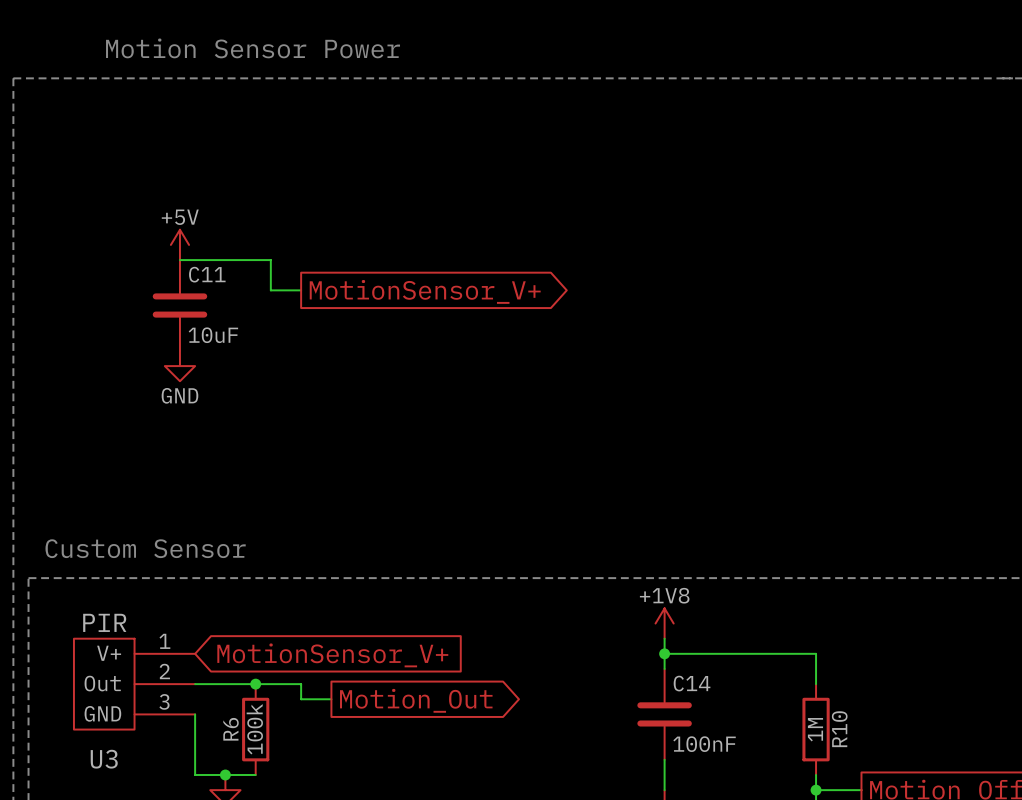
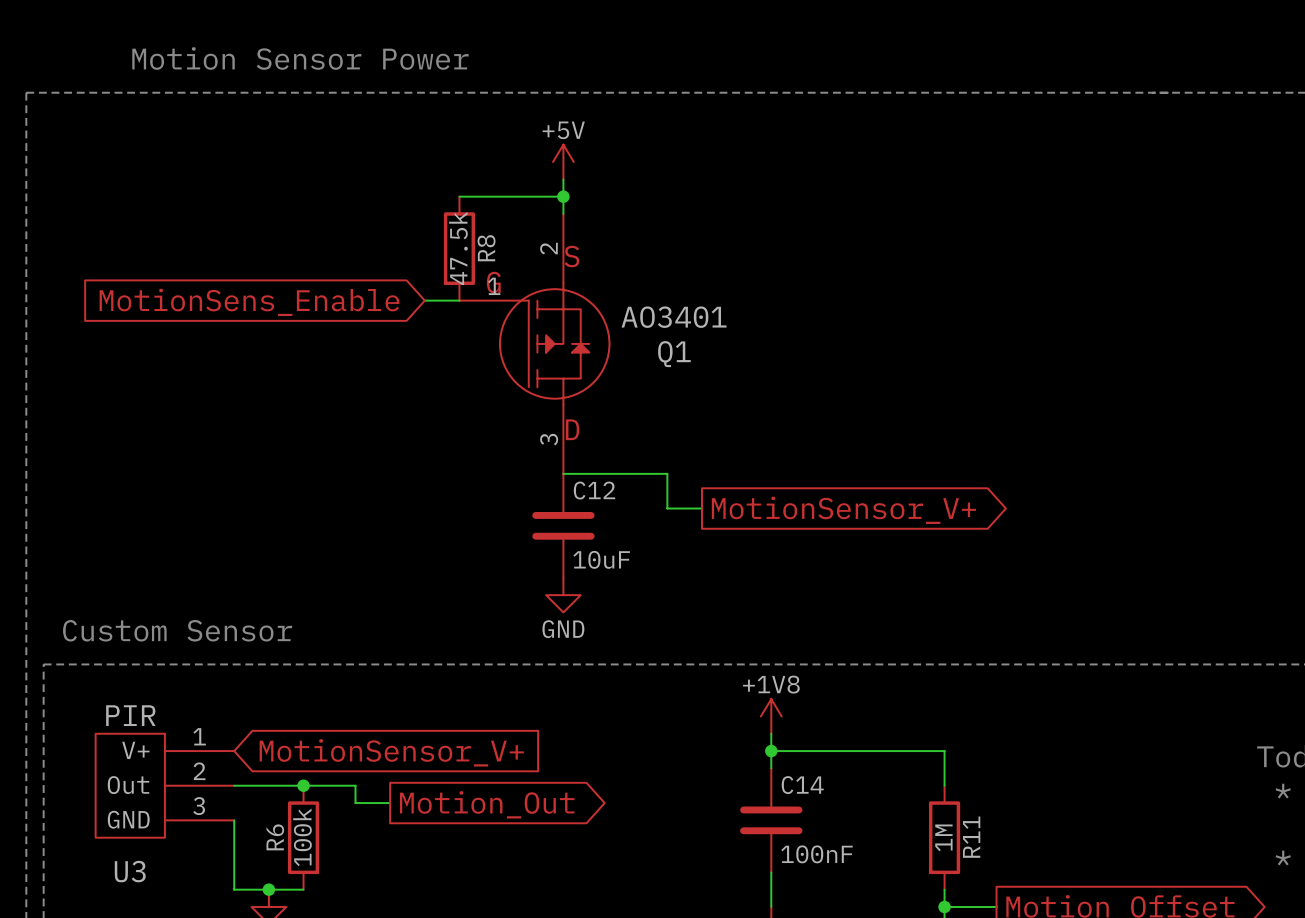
power symbol: none -> +5V (563, 162)
wire: none -> (563, 179) (563, 213)
wire: none -> (459, 196) (563, 196)
junction: none -> (563, 196)
R8: none -> 47.5k (459, 248)
power symbol: +5V (179, 244) -> none
wire: (179, 260) (270, 260) (270, 290) (301, 290) -> none
wire: none -> (424, 300) (459, 300)
global label shape: output (425, 291) -> input (249, 302)
global label: MotionSensor_V+ (425, 291) -> MotionSens_Enable (249, 302)
Q1: none -> AO3401 (534, 343)
C11: 10uF (179, 305) -> none
power symbol: GND (179, 366) -> none
wire: none -> (563, 473) (667, 473) (667, 508) (702, 508)
global label: none -> MotionSensor_V+ (843, 510)
C12: none -> 10uF (563, 525)
power symbol: none -> GND (563, 595)
R10 name: R10 (839, 729) -> R11 (971, 837)

